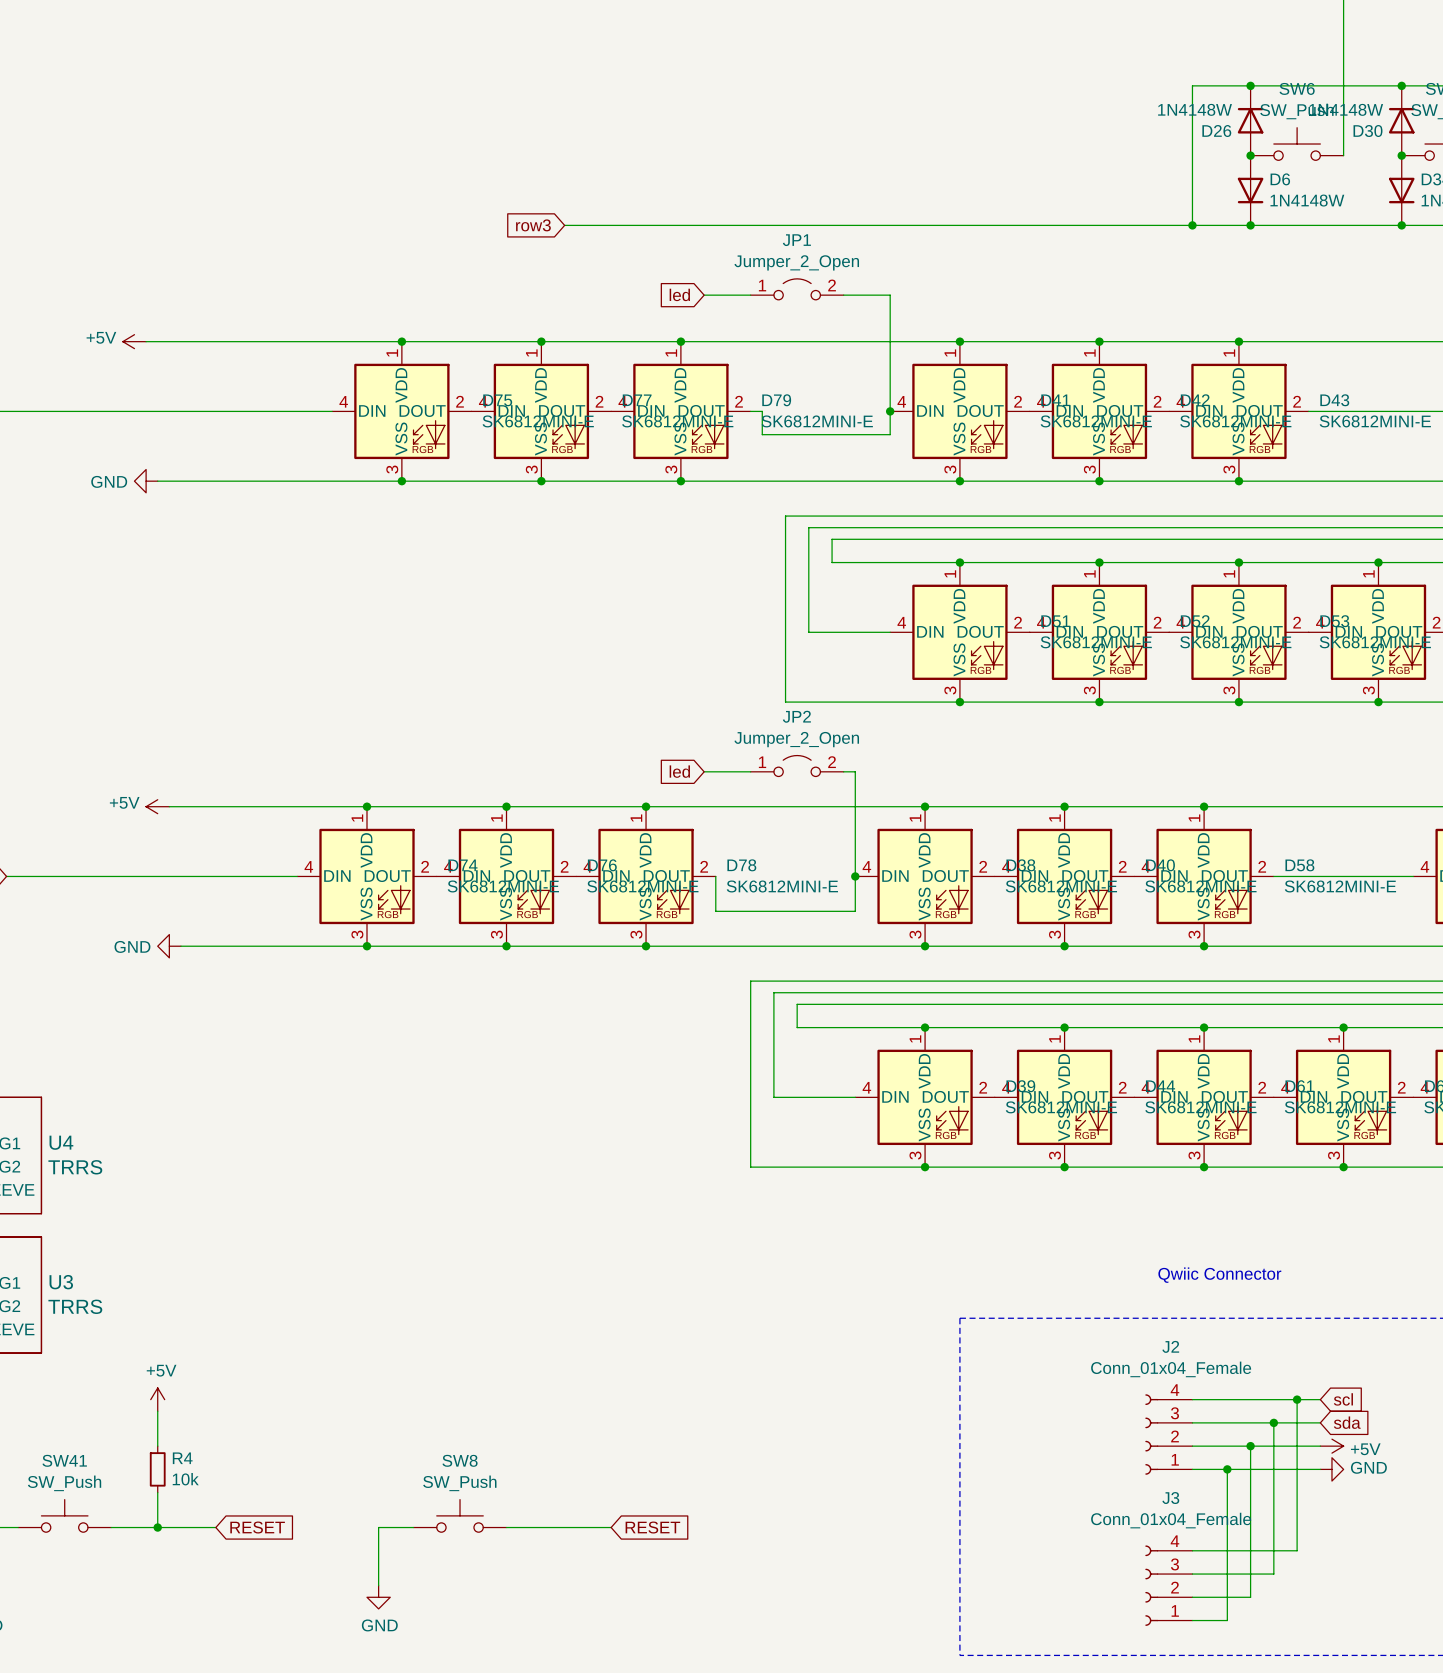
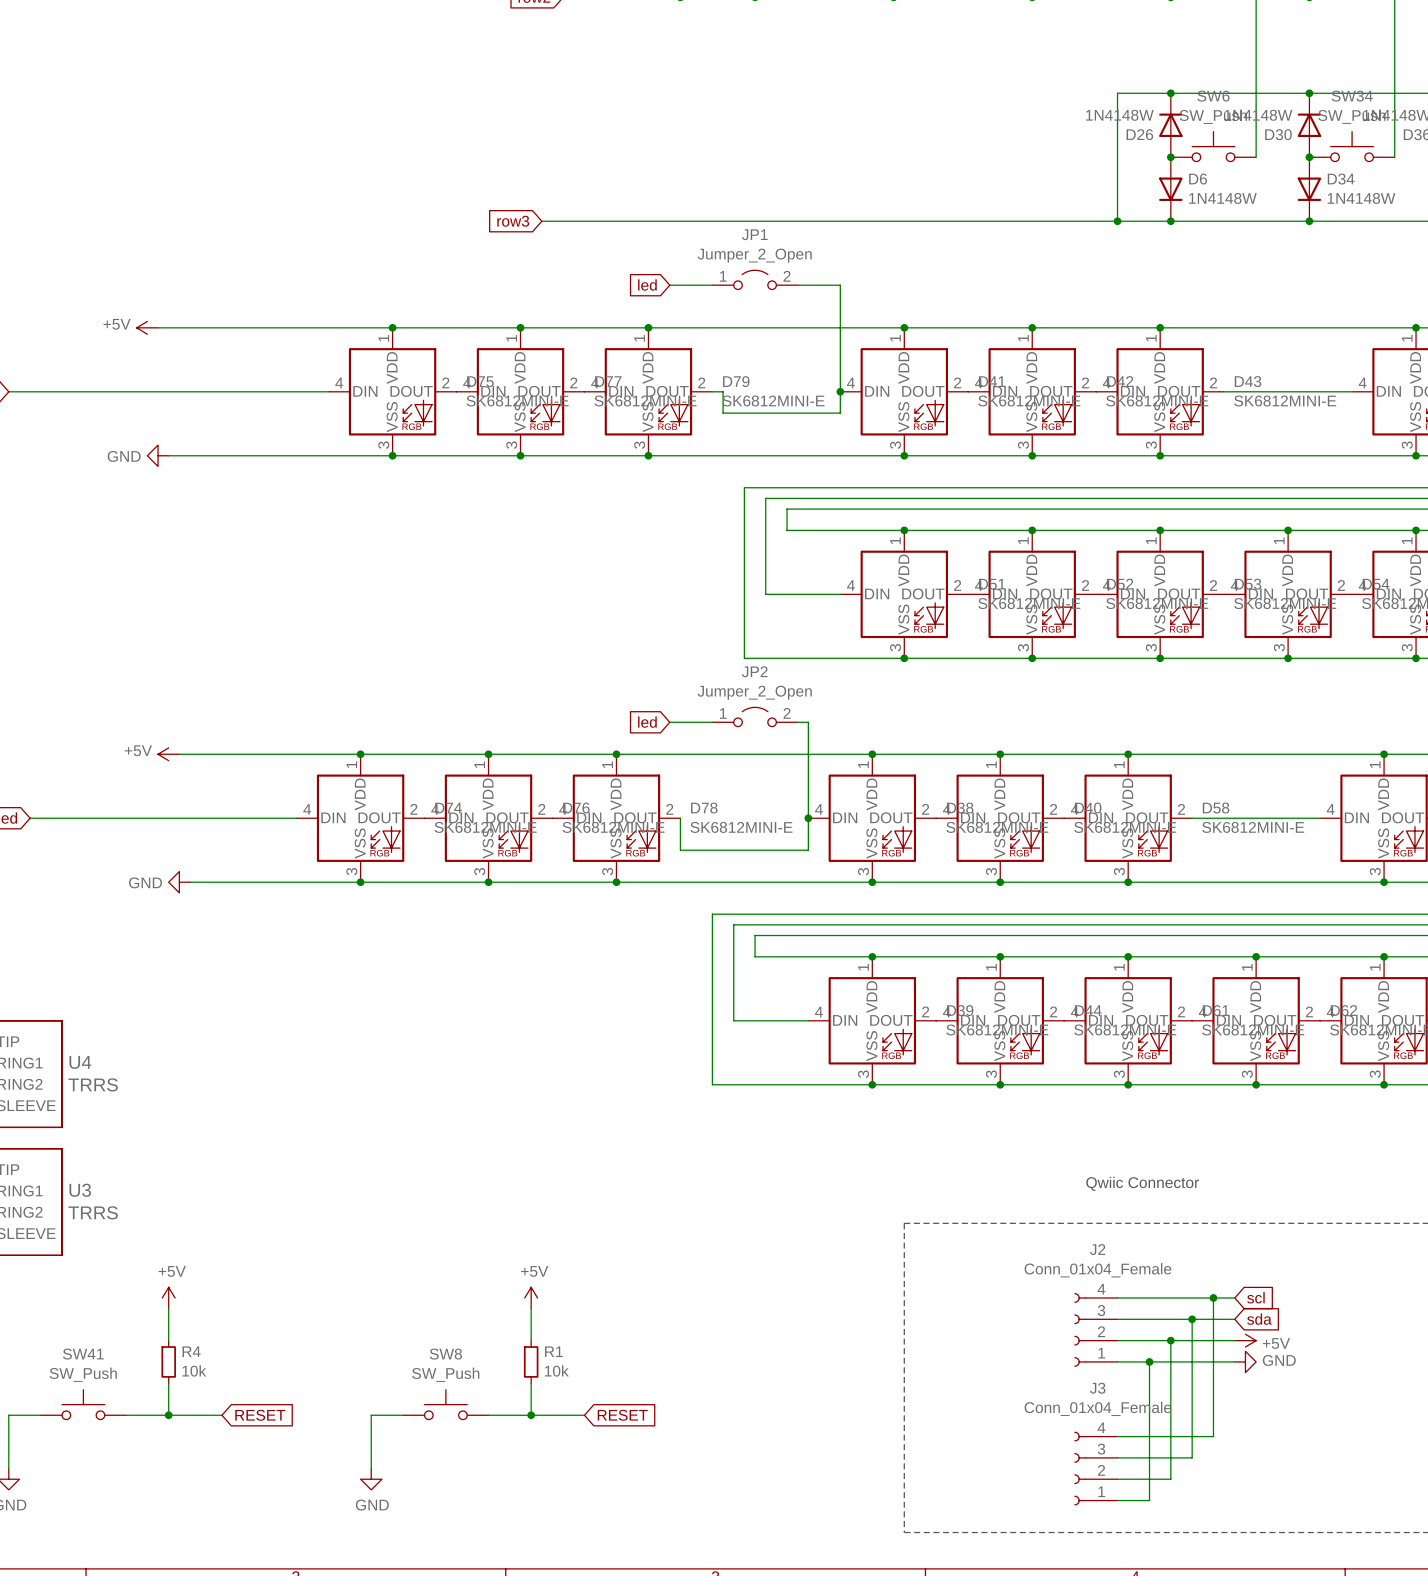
power symbol: none -> +5V (531, 1297)
wire: none -> (531, 1308) (531, 1340)
R1: none -> 10k (531, 1361)
wire: none -> (531, 1383) (531, 1415)
junction: none -> (531, 1415)

